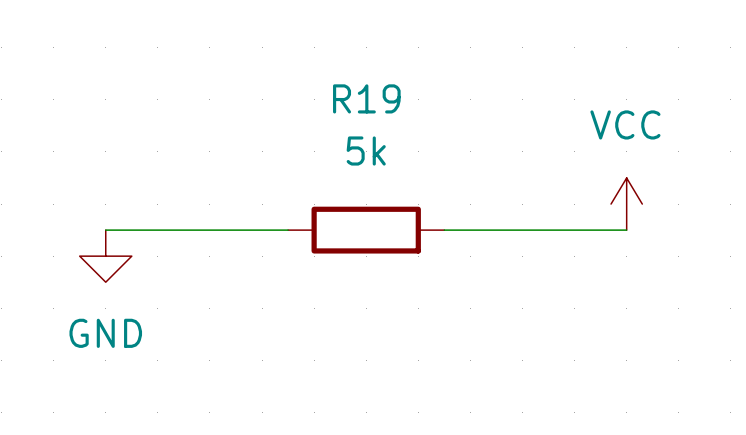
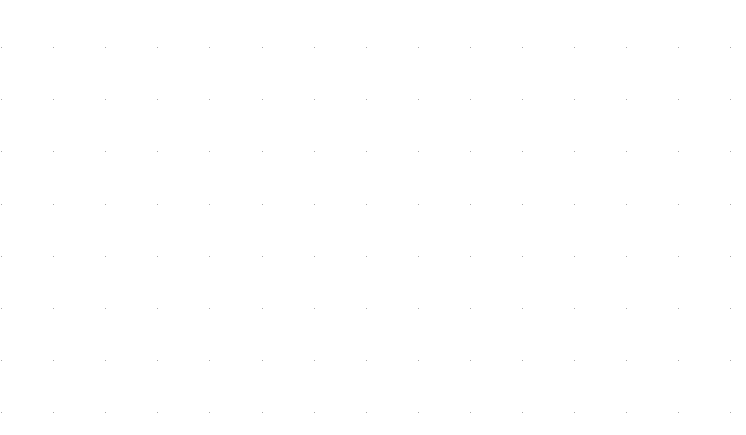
power symbol: VCC (626, 204) -> none
wire: (105, 230) (288, 230) -> none
R19: 5k (366, 230) -> none
wire: (444, 230) (626, 230) -> none
power symbol: GND (105, 256) -> none

